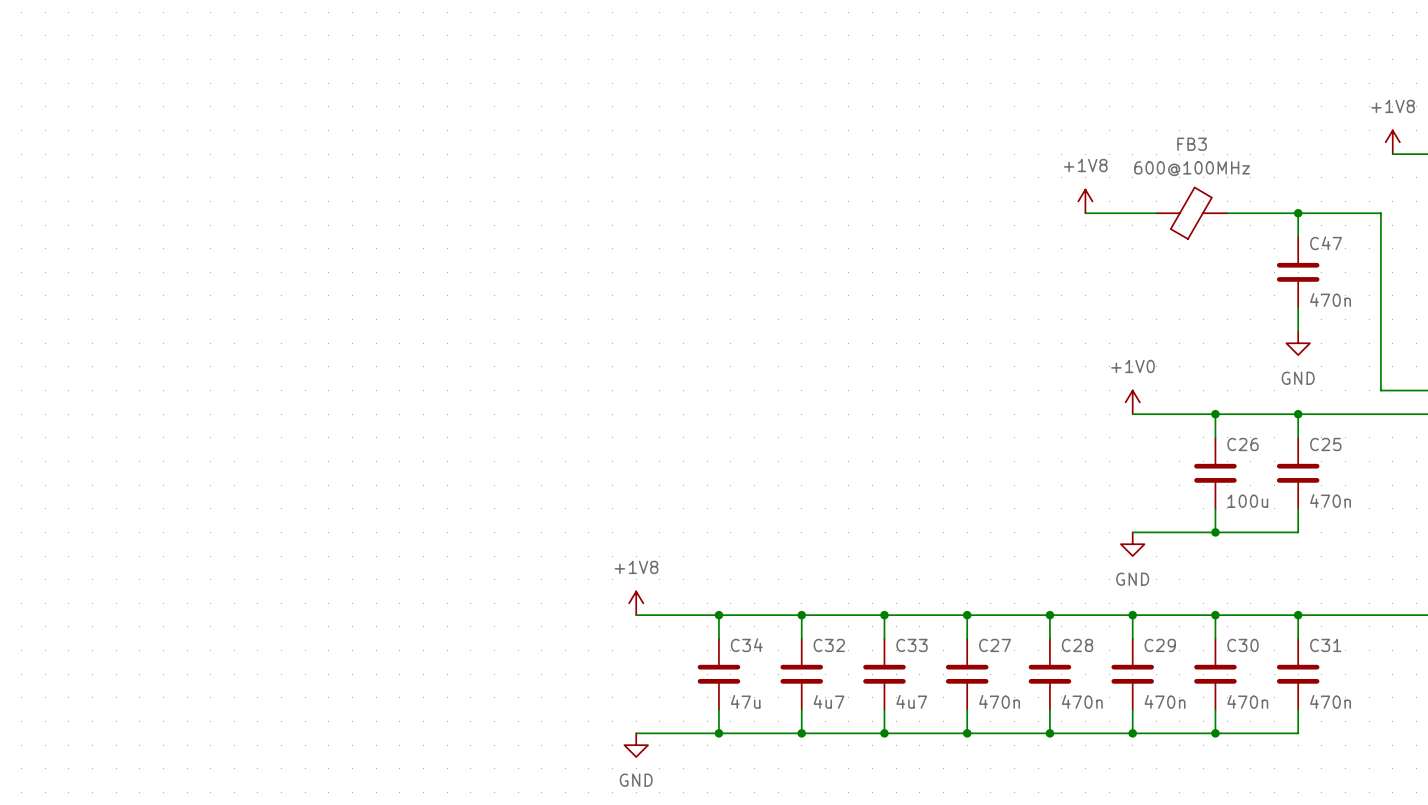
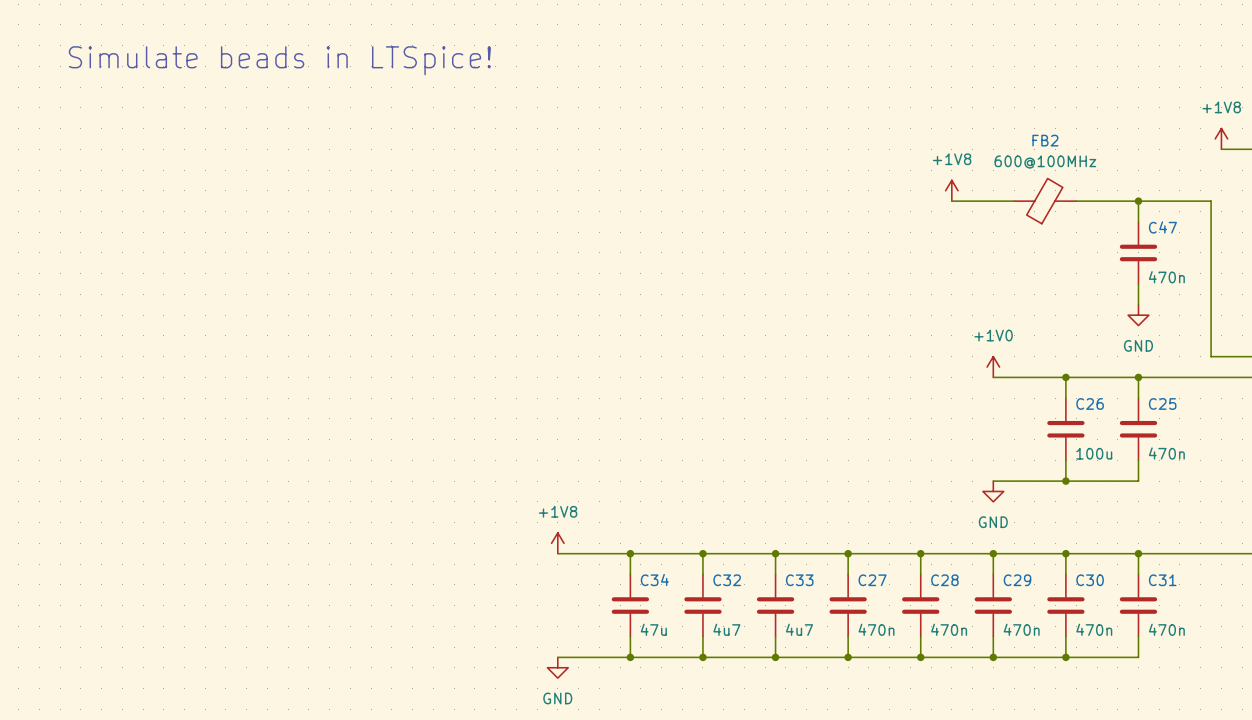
text: none -> Simulate beads in LTSpice! (279, 60)
FB3 name: FB3 (1192, 144) -> FB2 (1045, 140)

